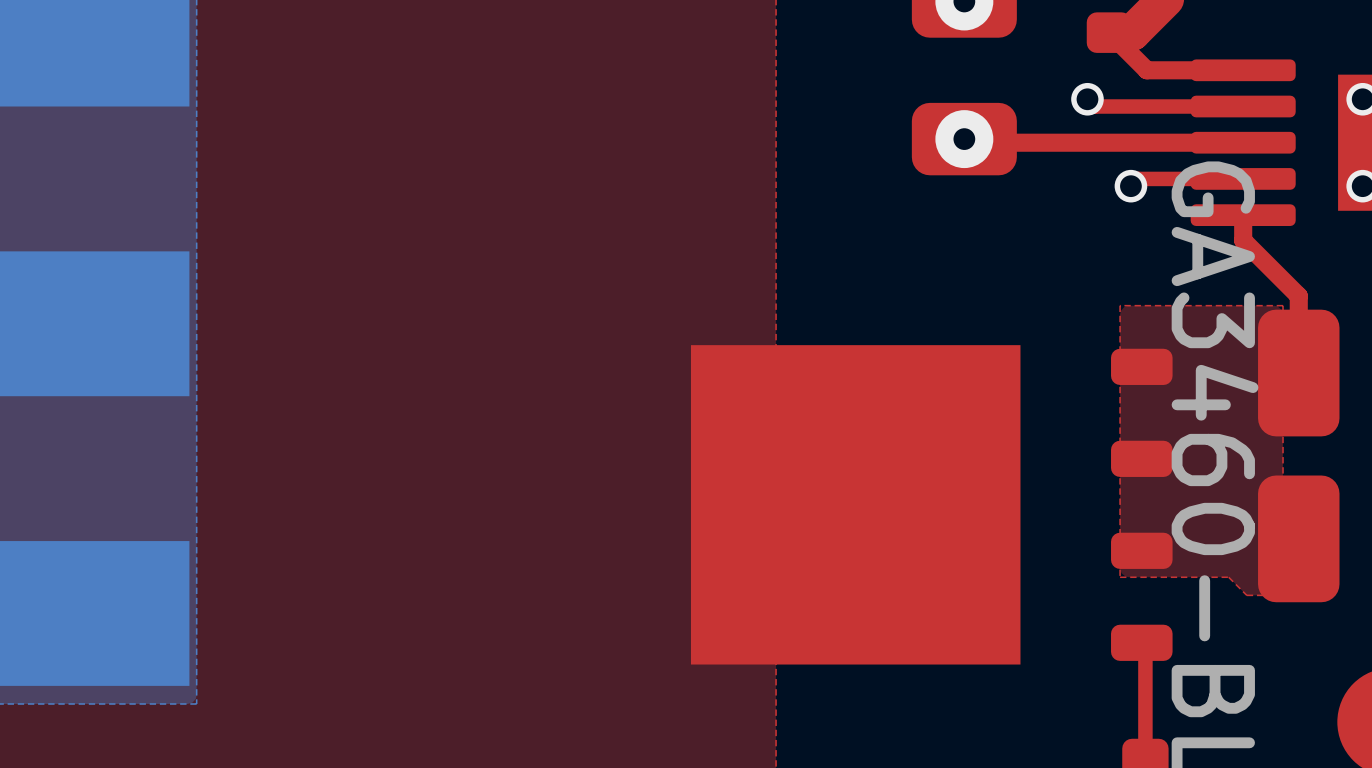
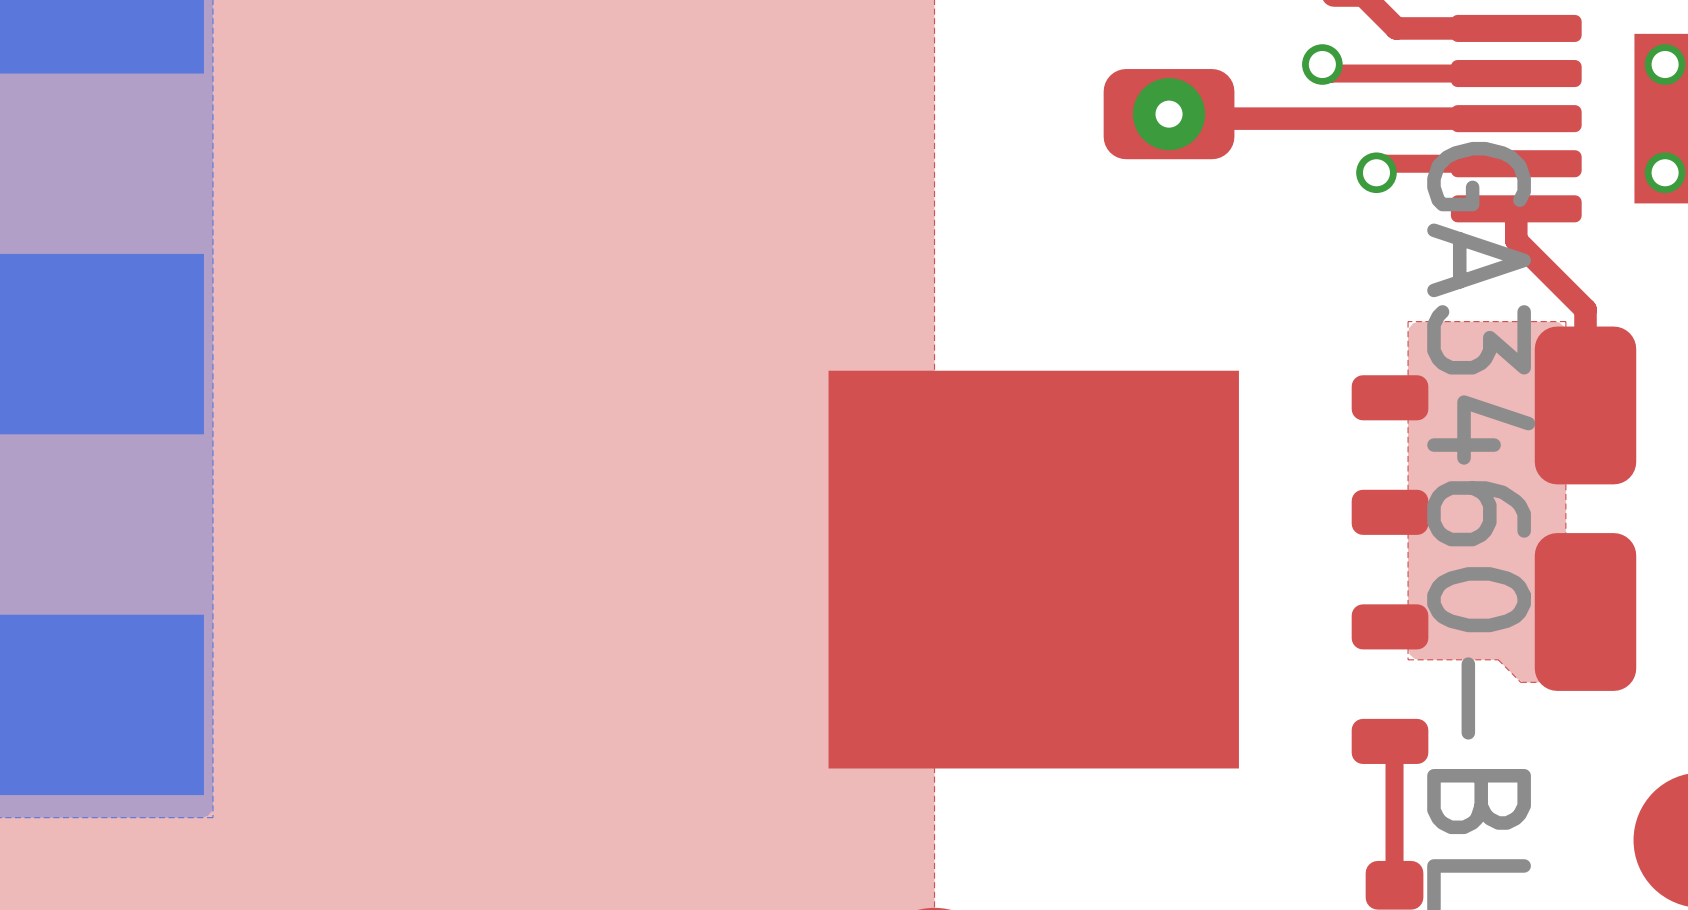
top zone outline: (1156, 305) (1120, 305) (1120, 577) (1156, 577) -> (1408, 321) (1408, 659)

